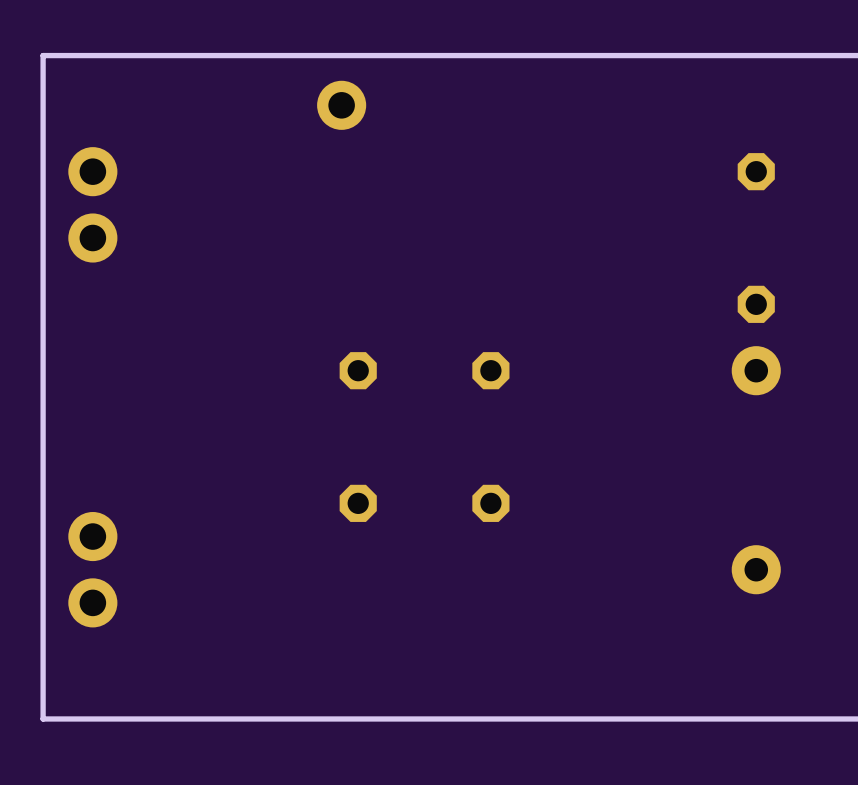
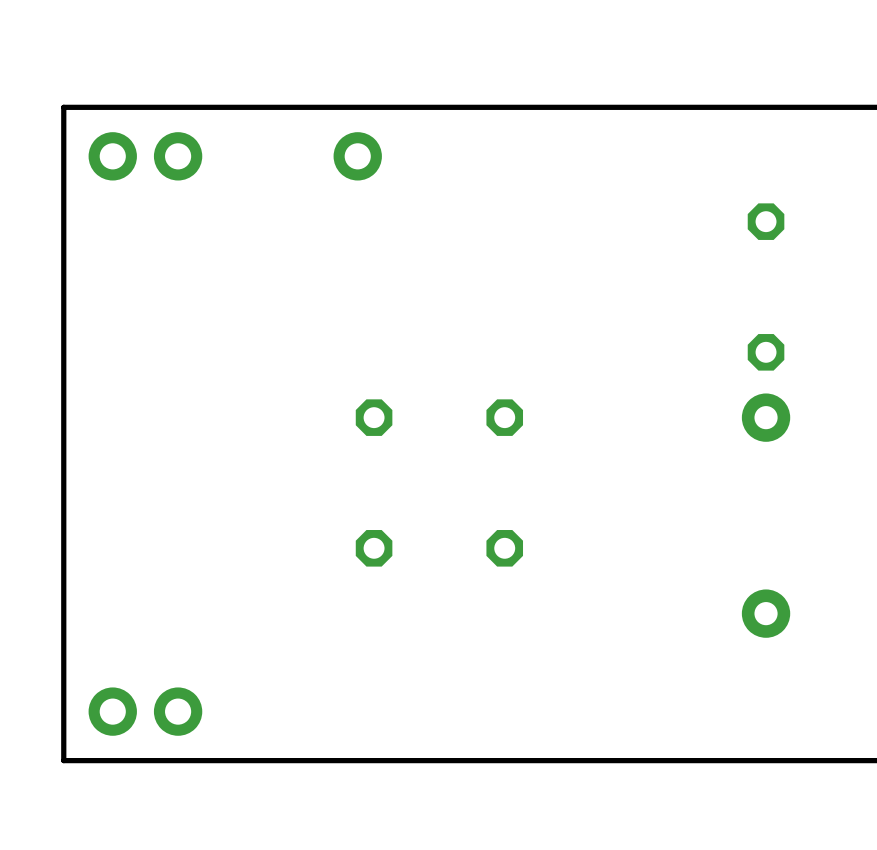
part rotation: 0° (92, 204) -> 90° clockwise (145, 156)
part position: (92, 204) -> (145, 156)
part rotation: 0° (92, 569) -> 90° clockwise (145, 711)
part position: (92, 569) -> (145, 711)

